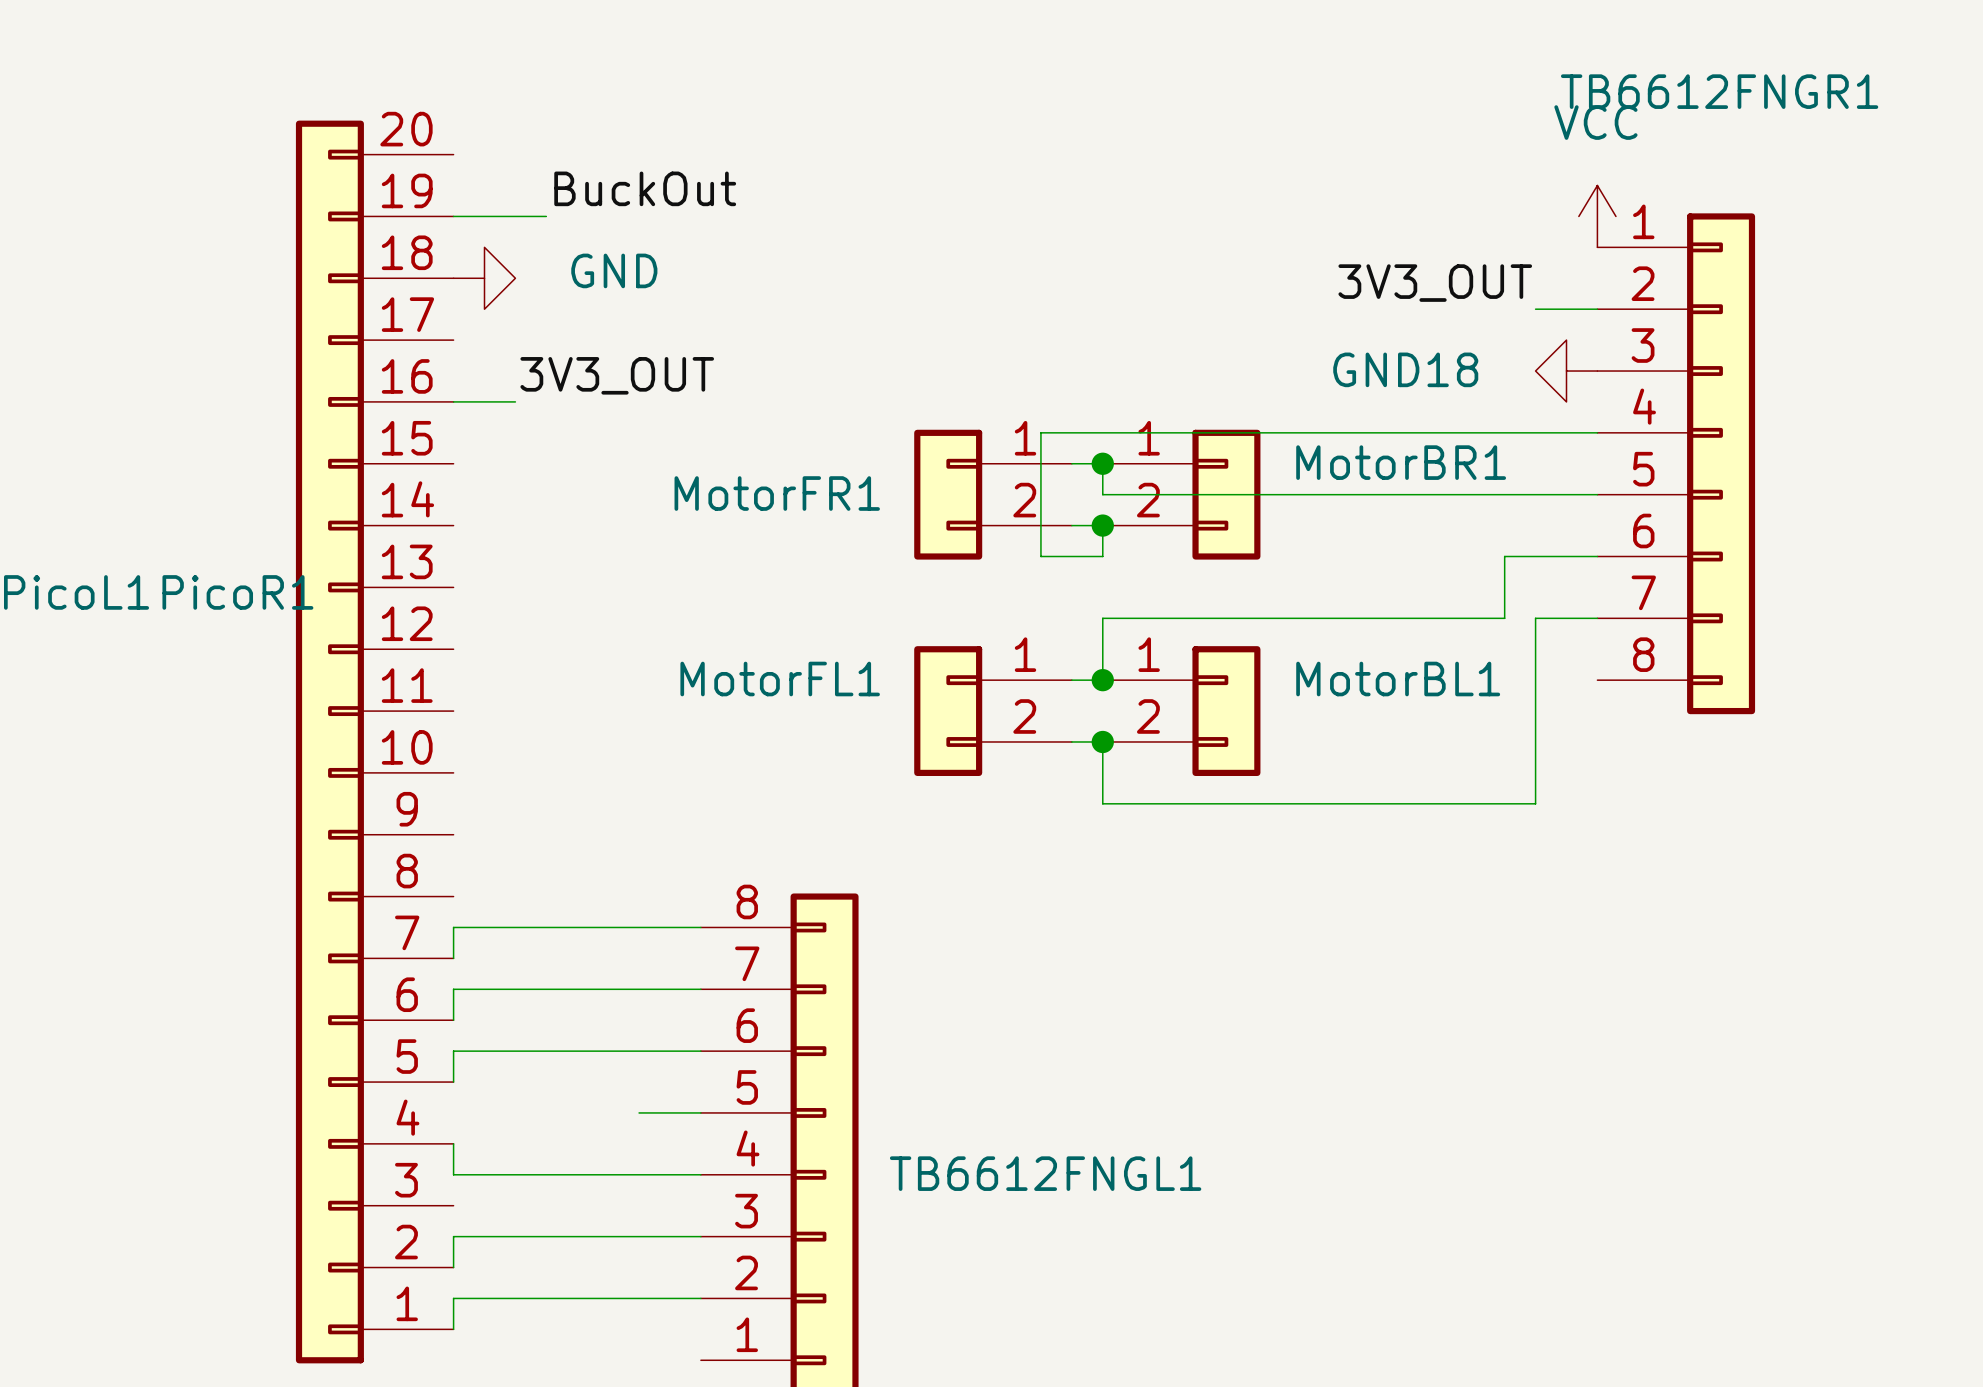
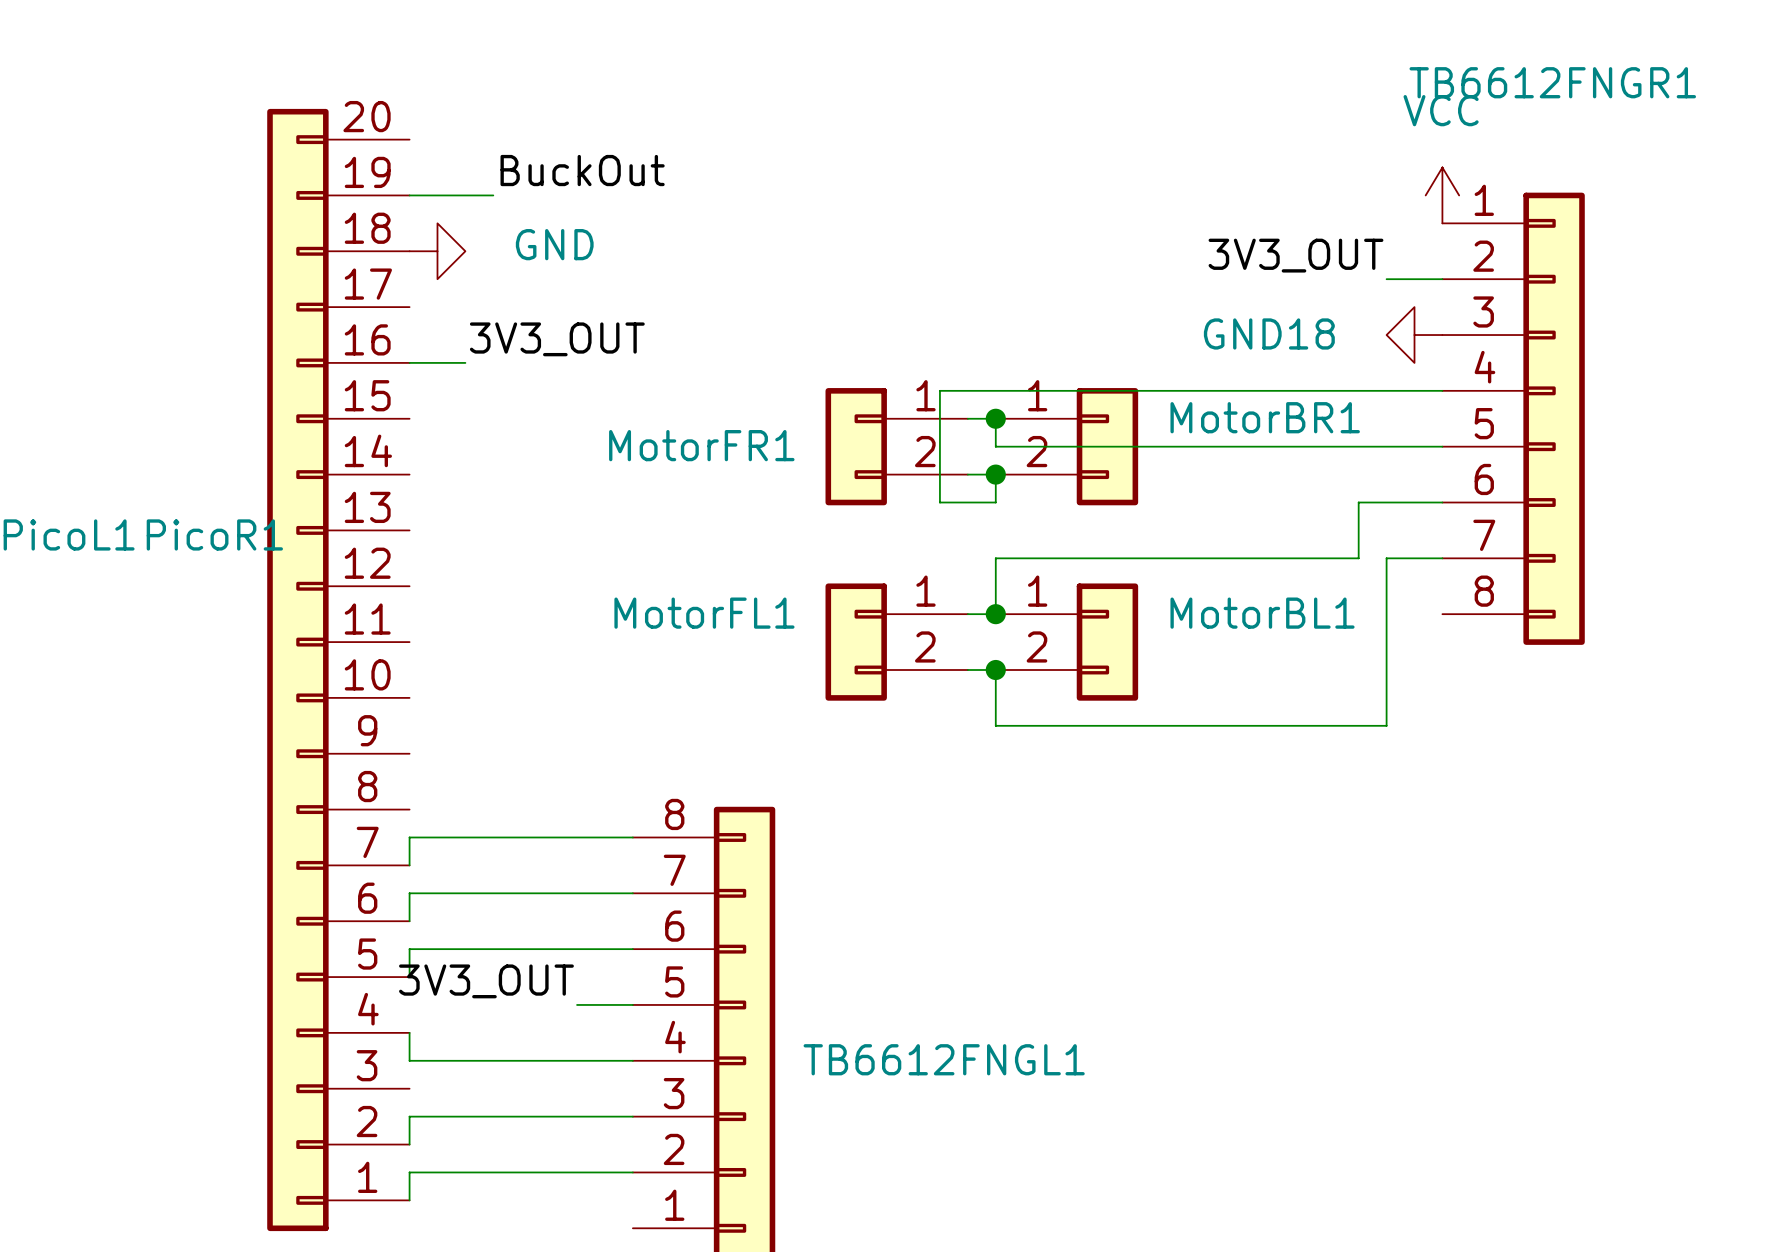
label: none -> 3V3_OUT (486, 981)

